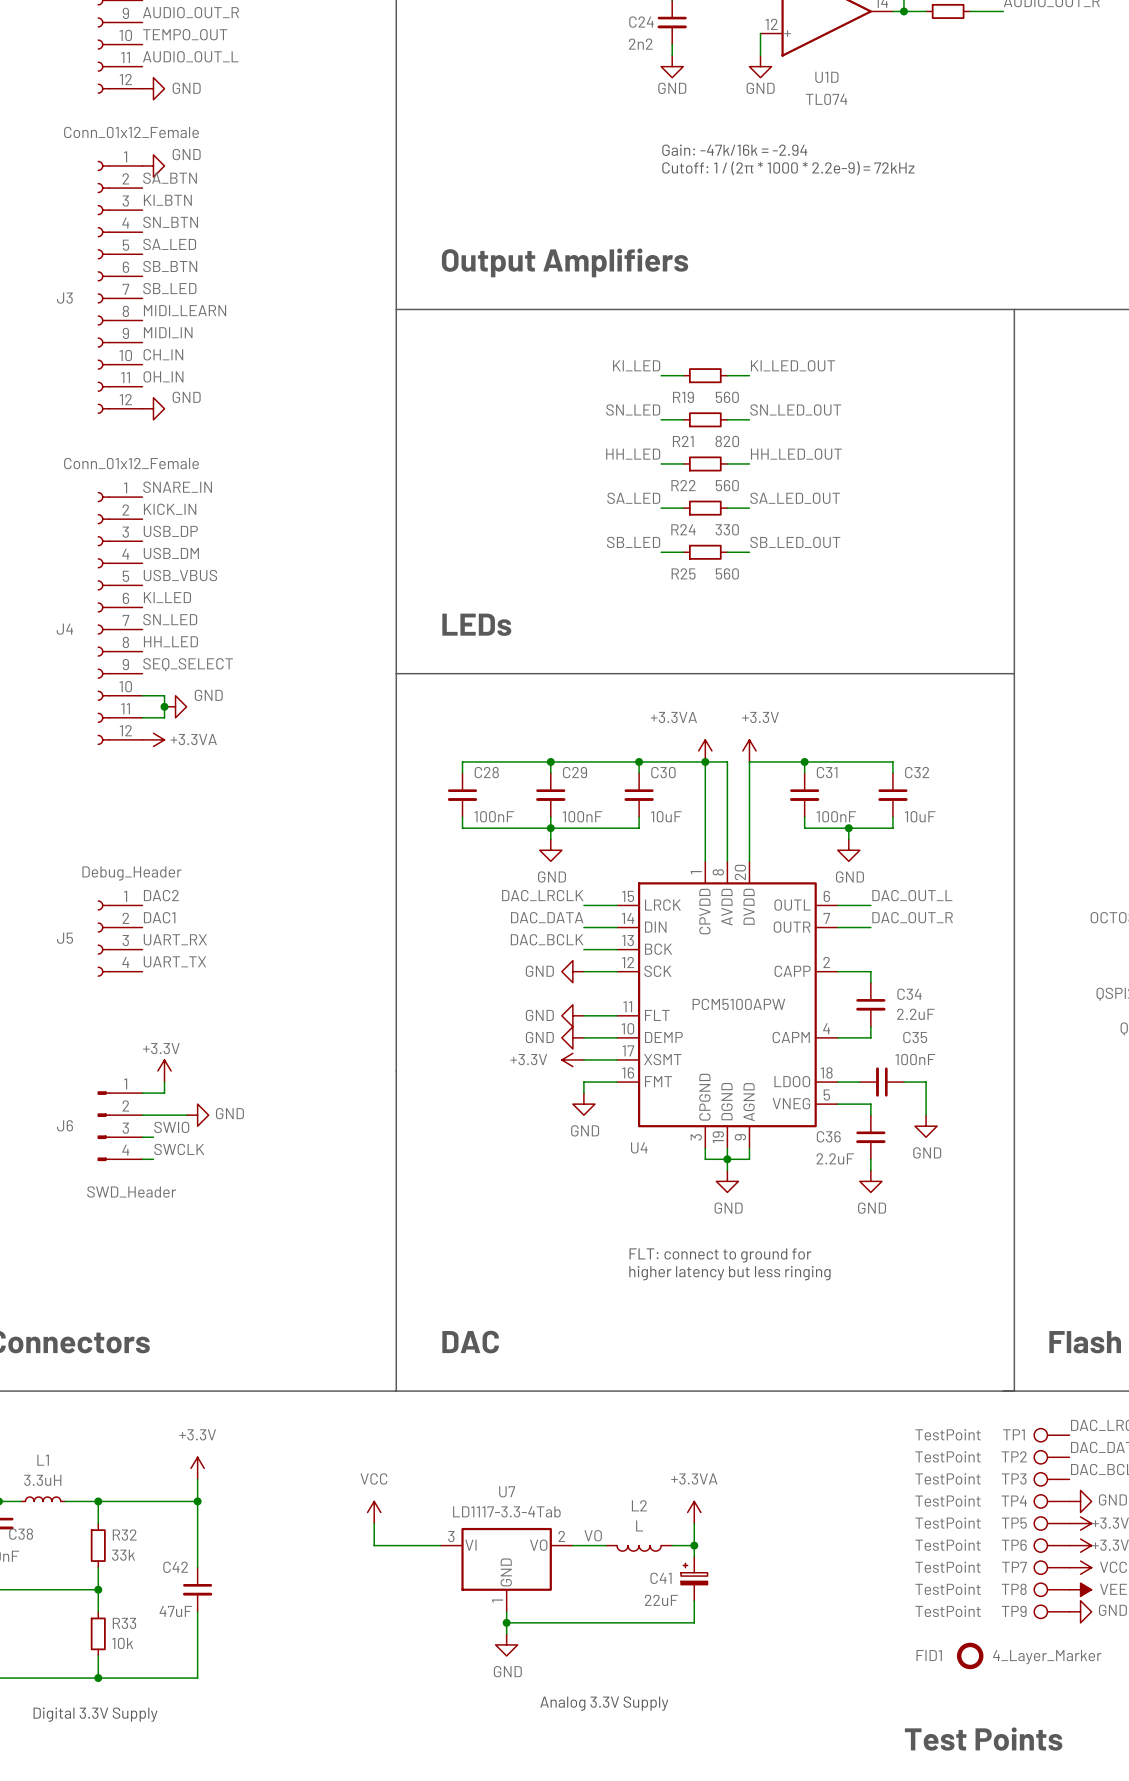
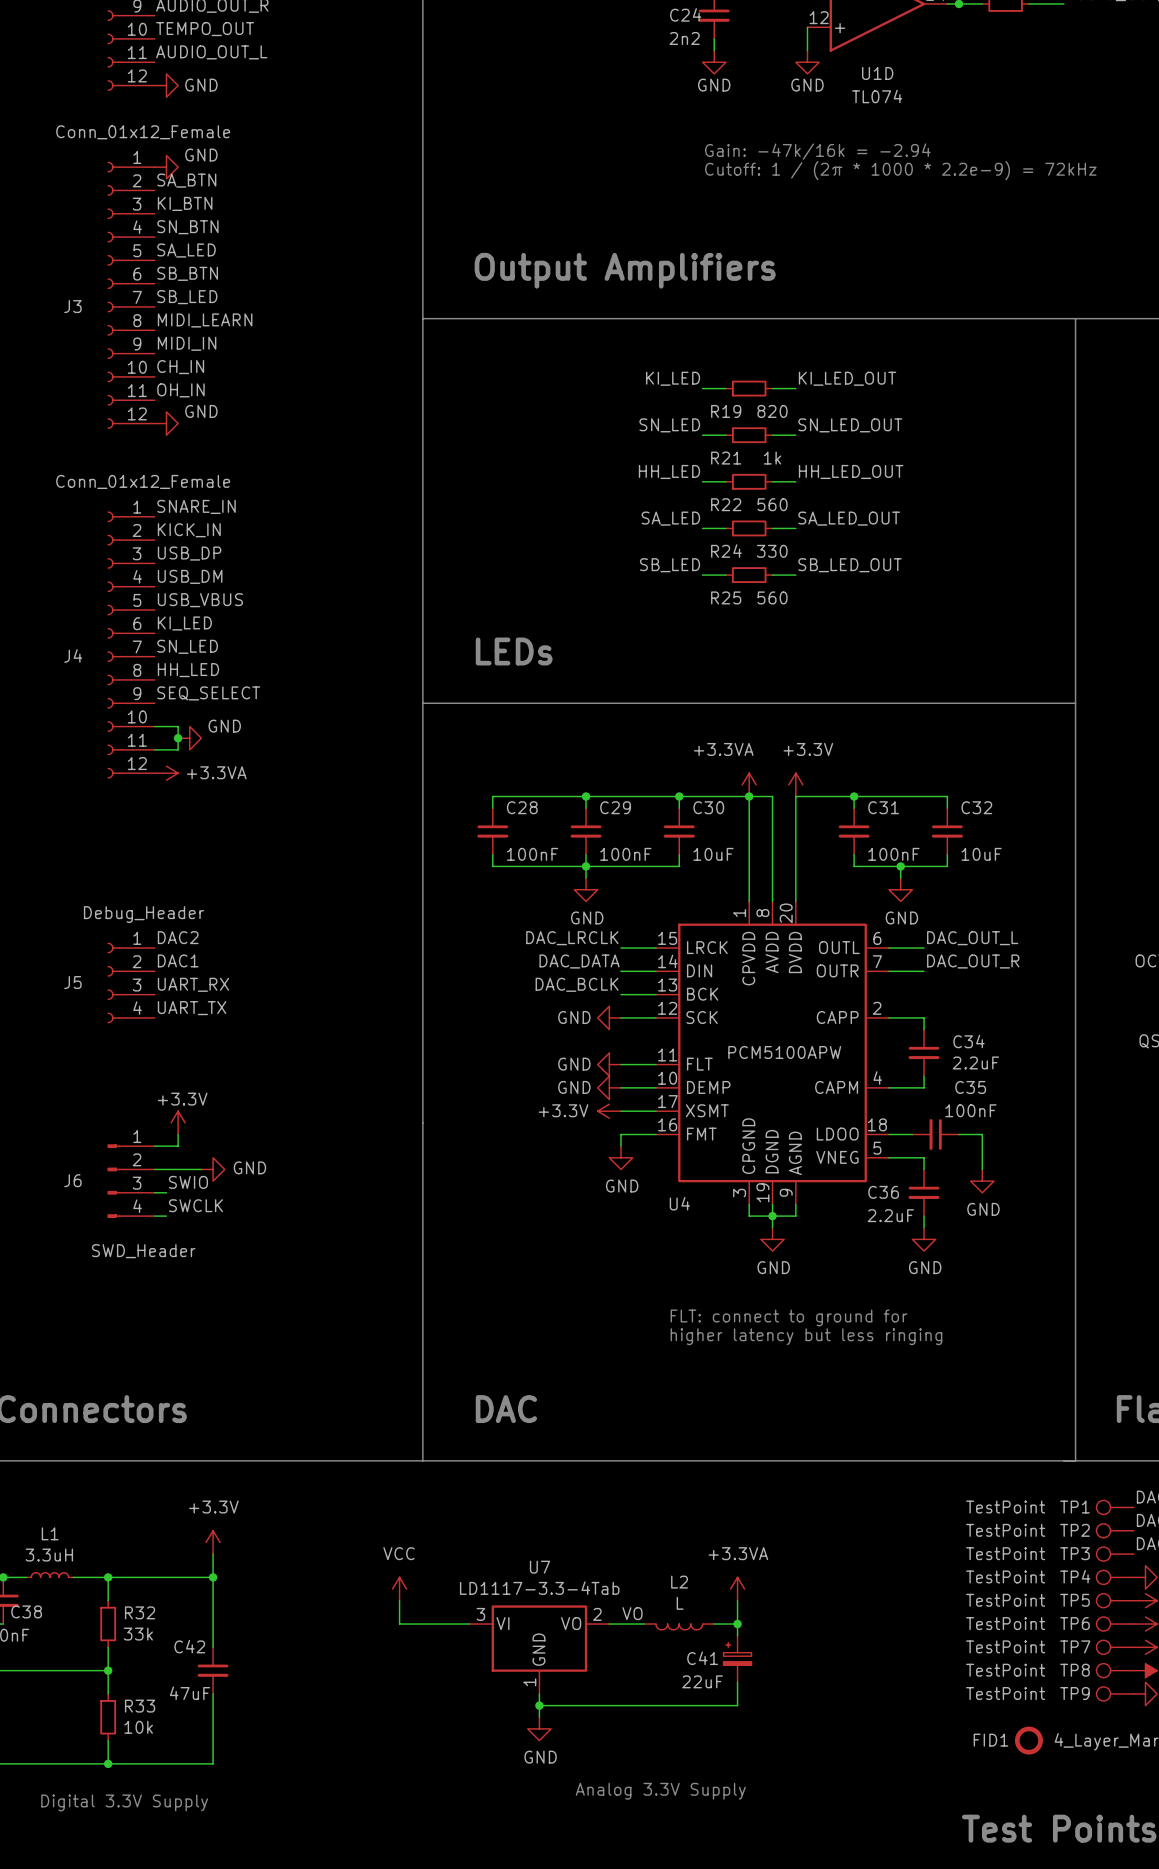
R19 value: 560 (727, 397) -> 820 (772, 411)
R21 value: 820 (727, 441) -> 1k (772, 458)

